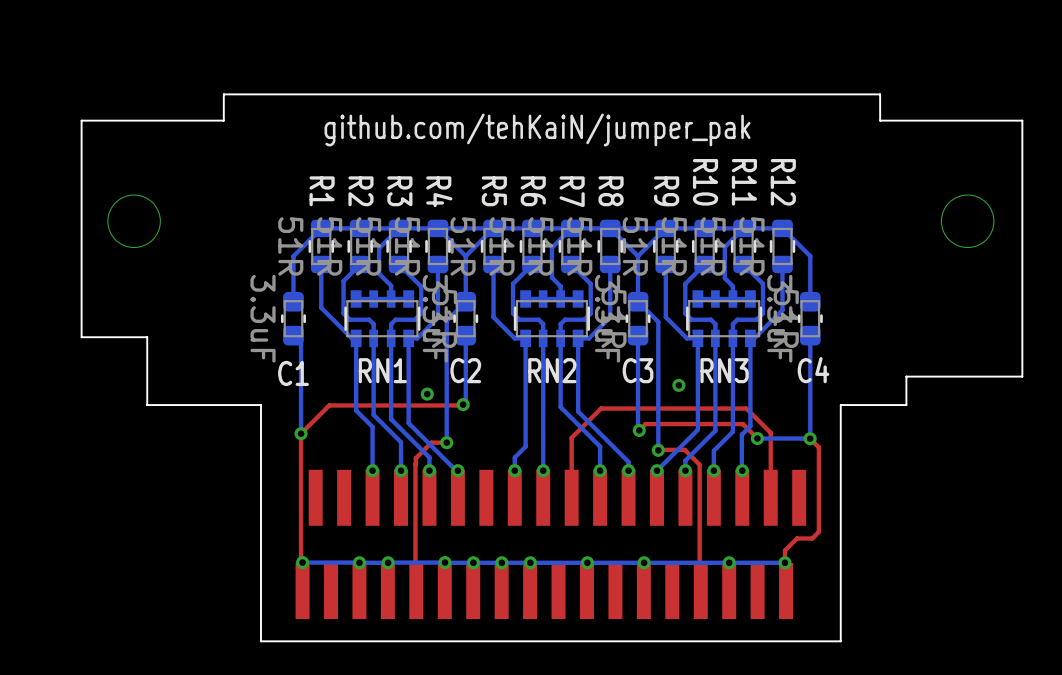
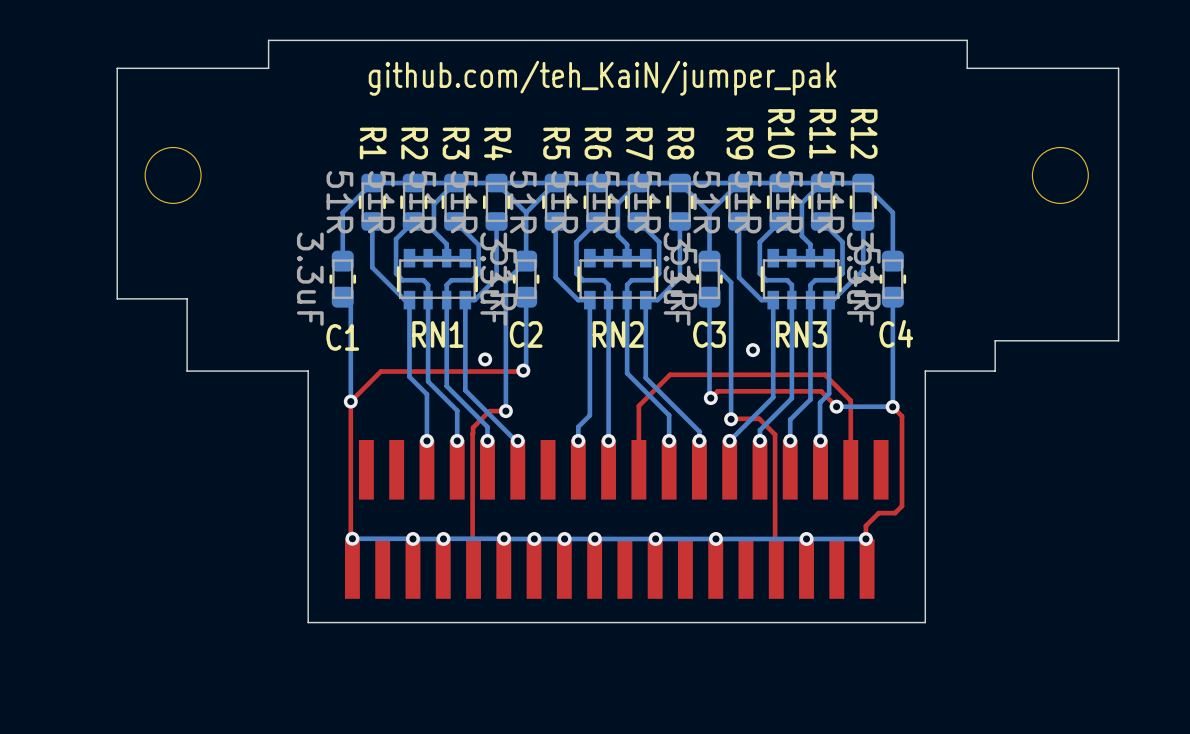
text: github.com/tehKaiN/jumper_pak (537, 129) -> github.com/teh_KaiN/jumper_pak (602, 78)

